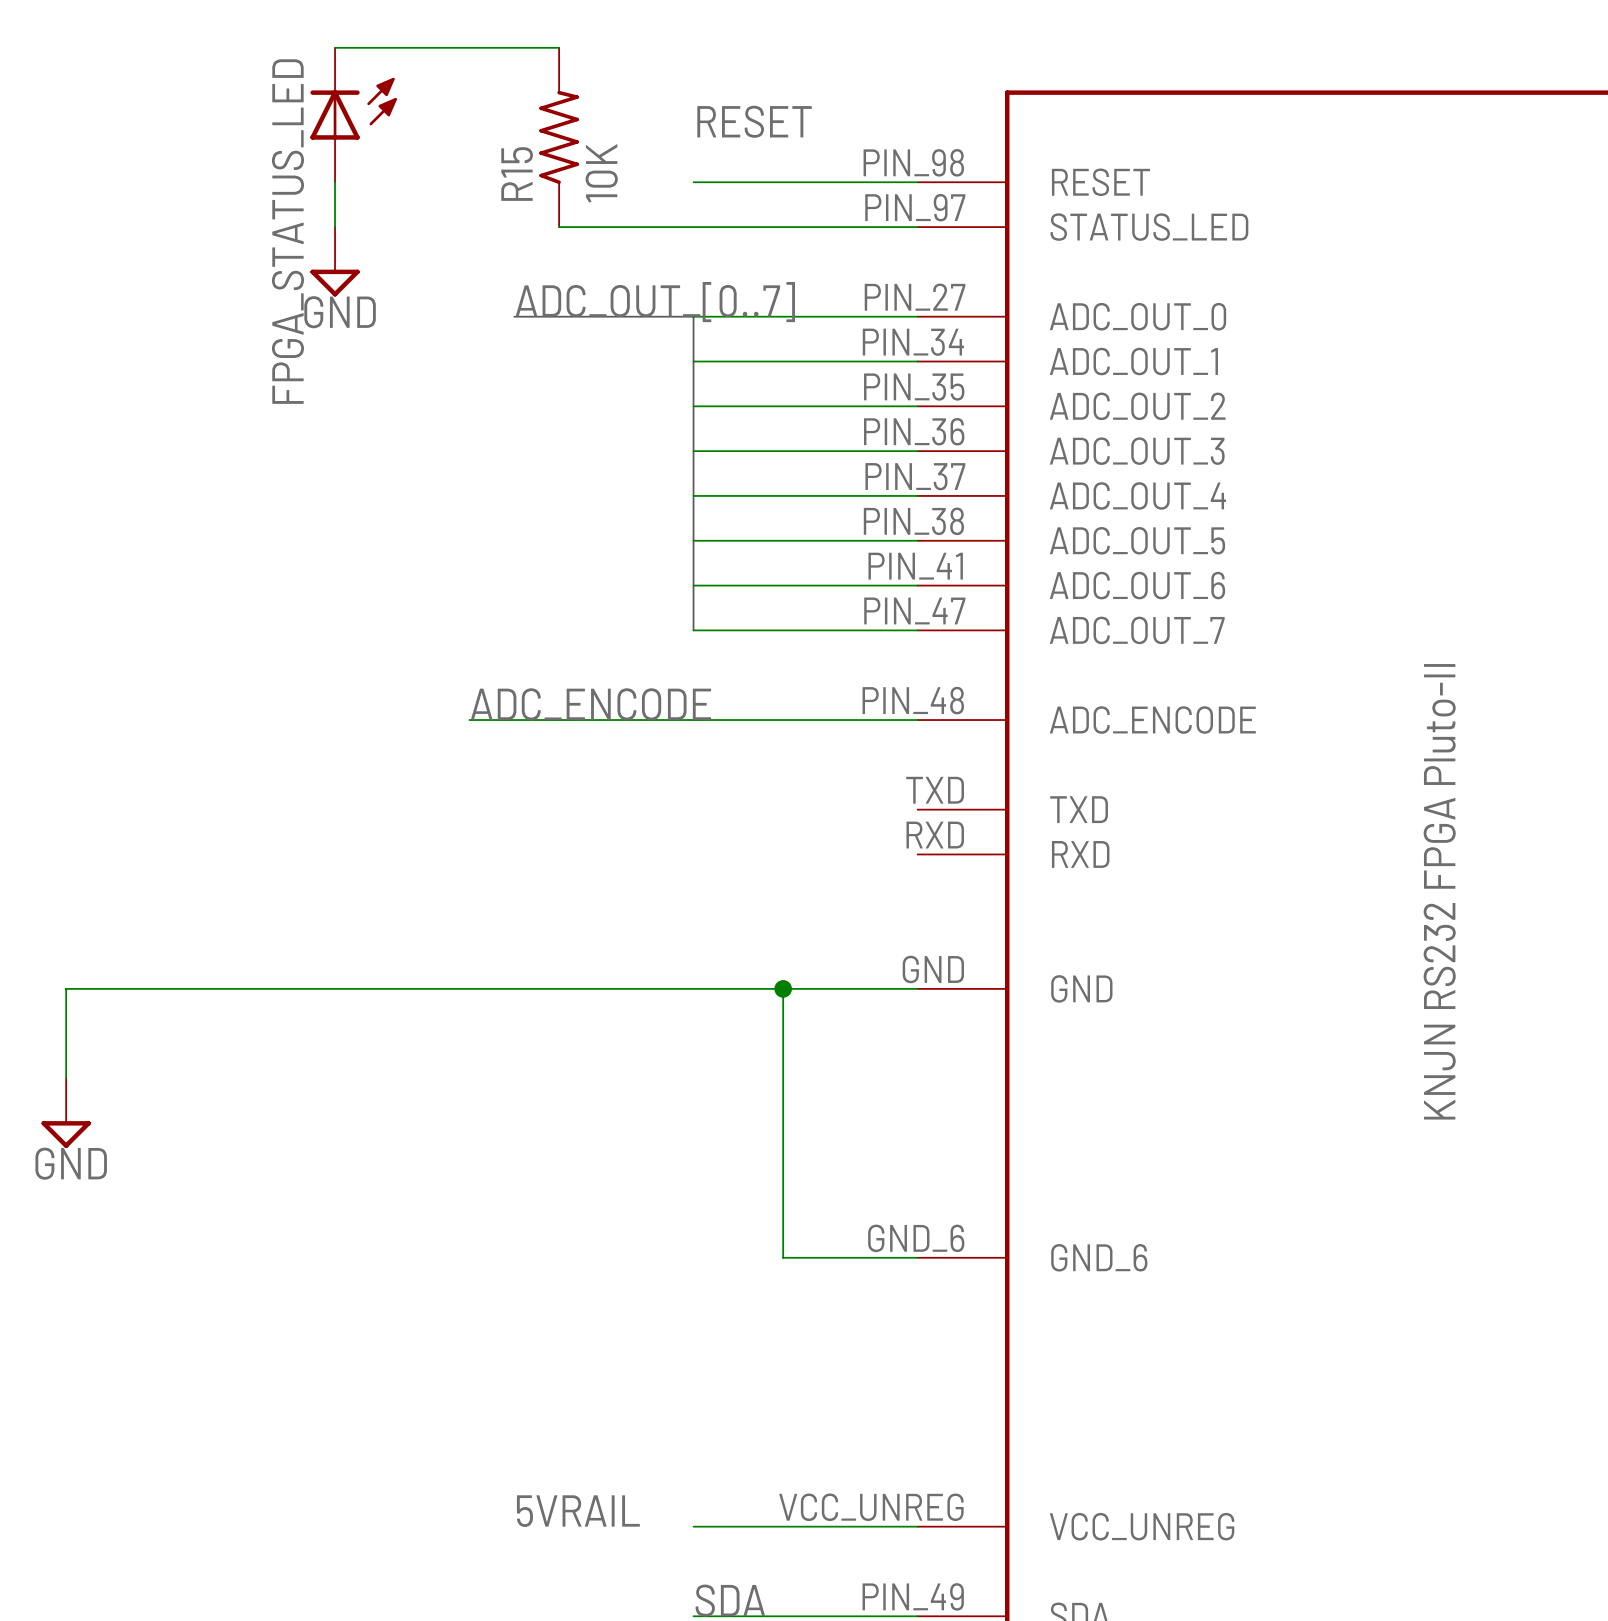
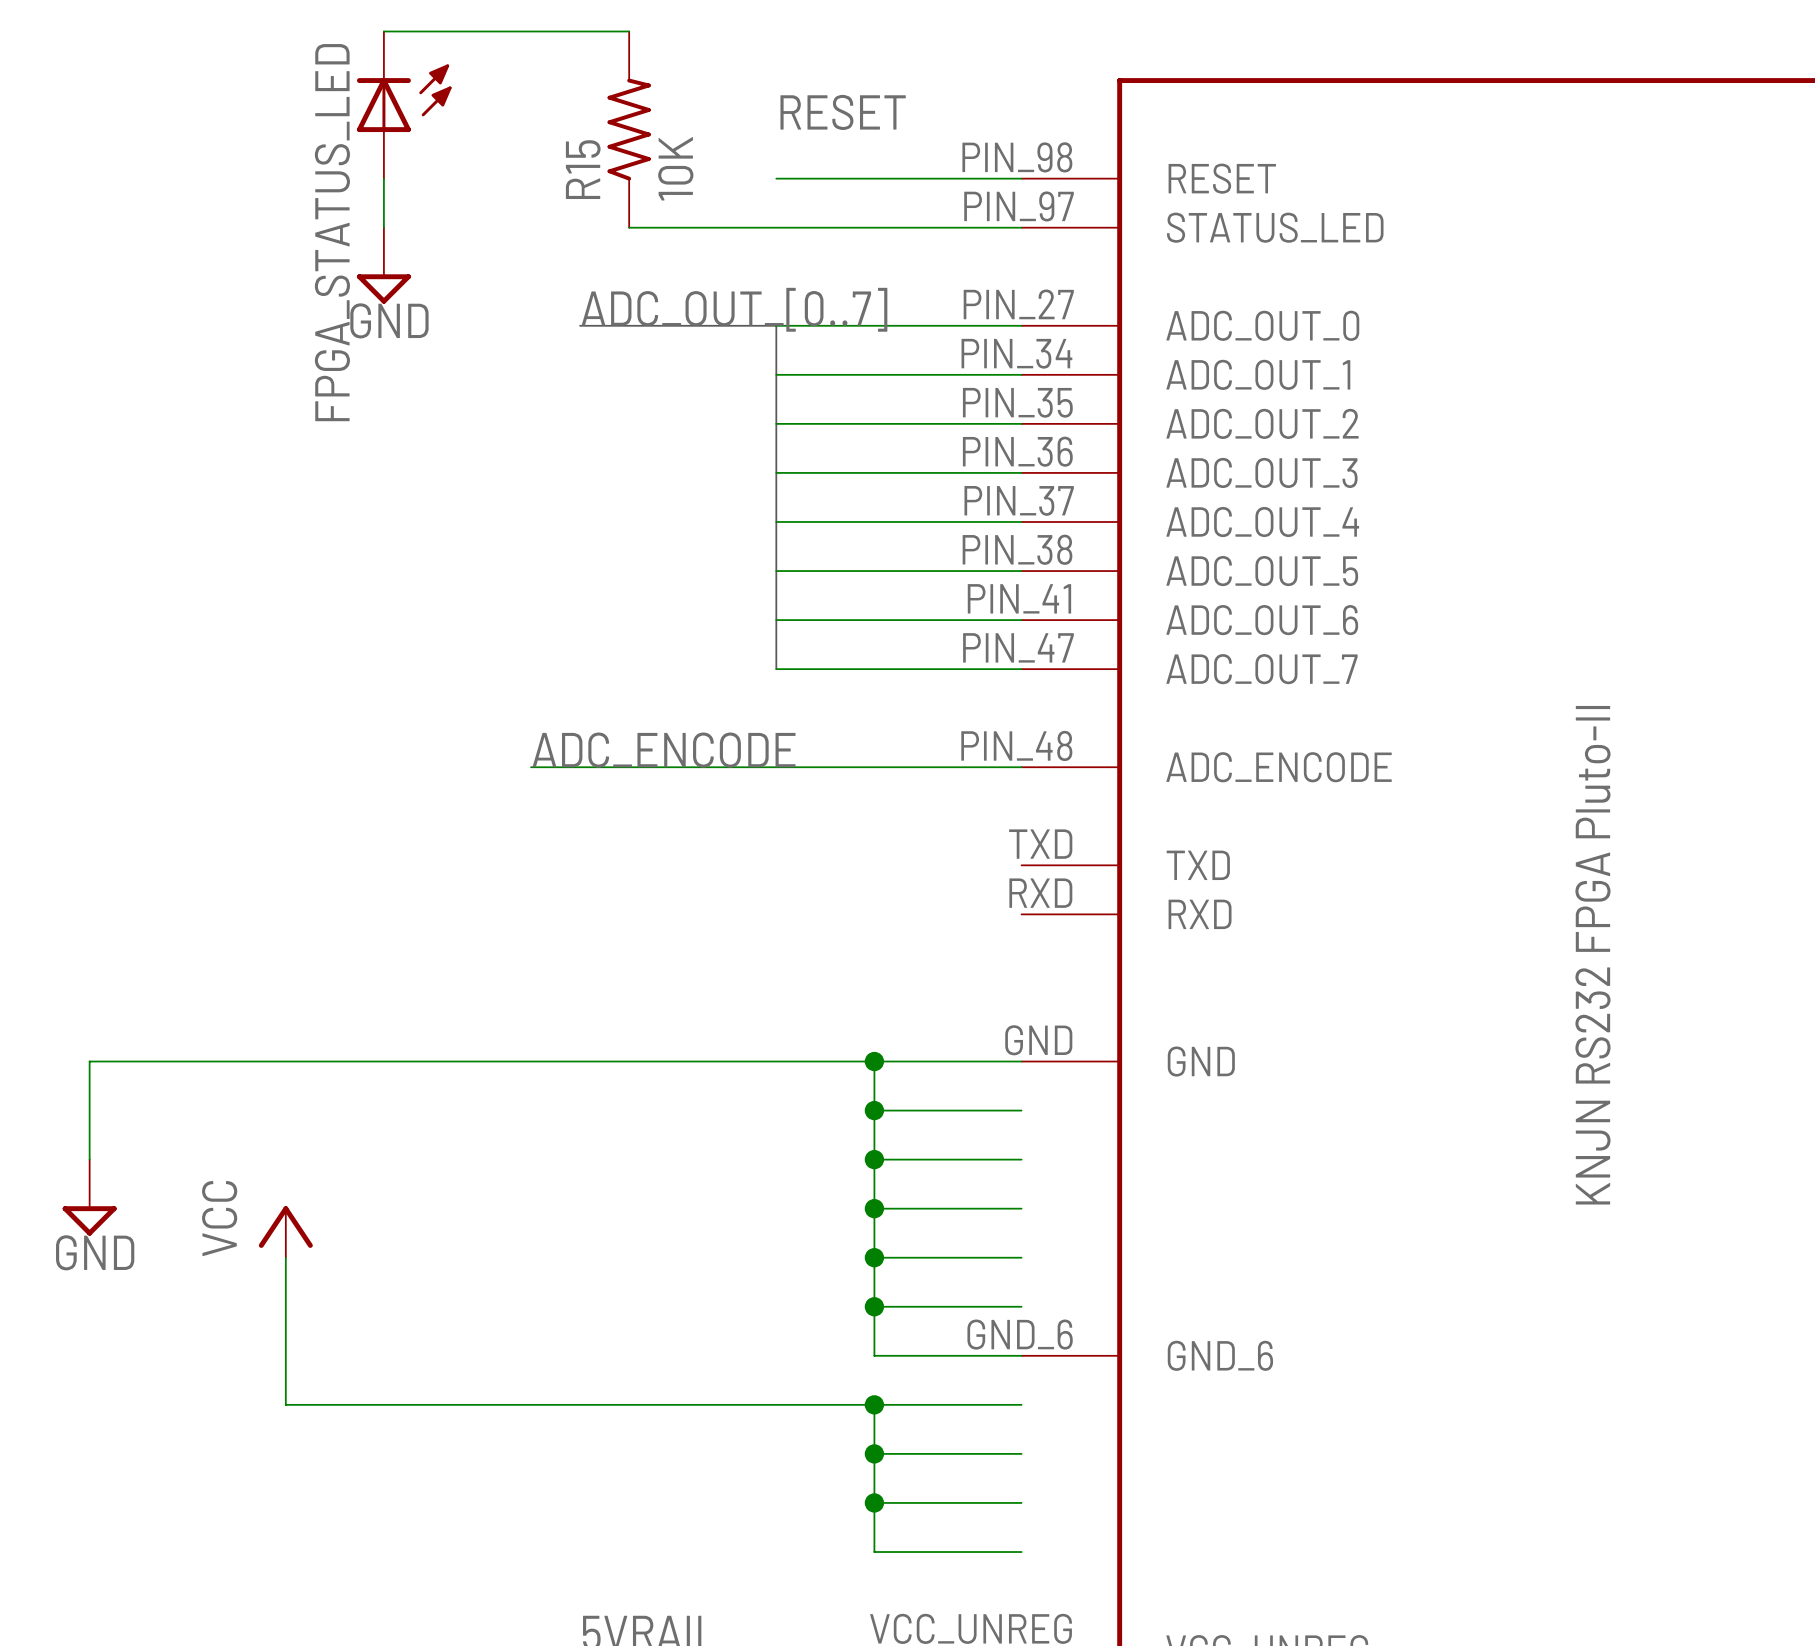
wire: none -> (874, 1110) (1021, 1110)
junction: none -> (874, 1110)
wire: none -> (874, 1159) (1021, 1159)
junction: none -> (874, 1159)
wire: none -> (874, 1208) (1021, 1208)
junction: none -> (874, 1208)
power symbol: none -> VCC (285, 1231)
wire: none -> (285, 1257) (285, 1404) (1021, 1404)
wire: none -> (874, 1257) (1021, 1257)
junction: none -> (874, 1257)
wire: none -> (874, 1306) (1021, 1306)
junction: none -> (874, 1306)
wire: none -> (874, 1404) (874, 1552) (1021, 1552)
junction: none -> (874, 1404)
wire: none -> (874, 1453) (1021, 1453)
junction: none -> (874, 1453)
wire: none -> (874, 1502) (1021, 1502)
junction: none -> (874, 1502)

